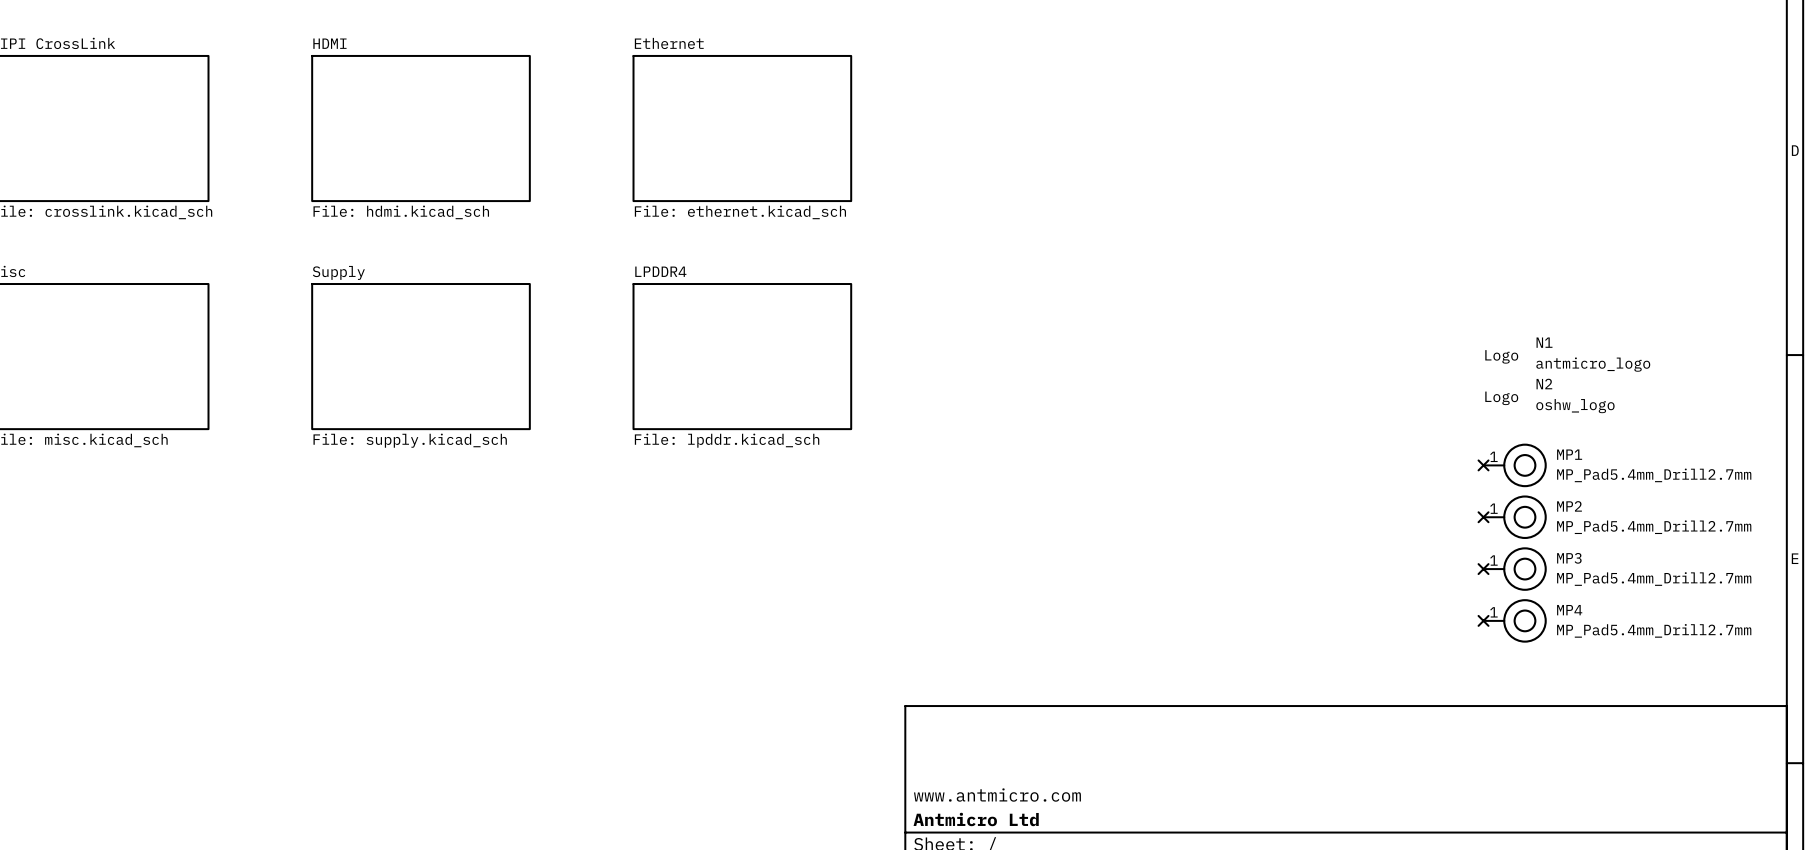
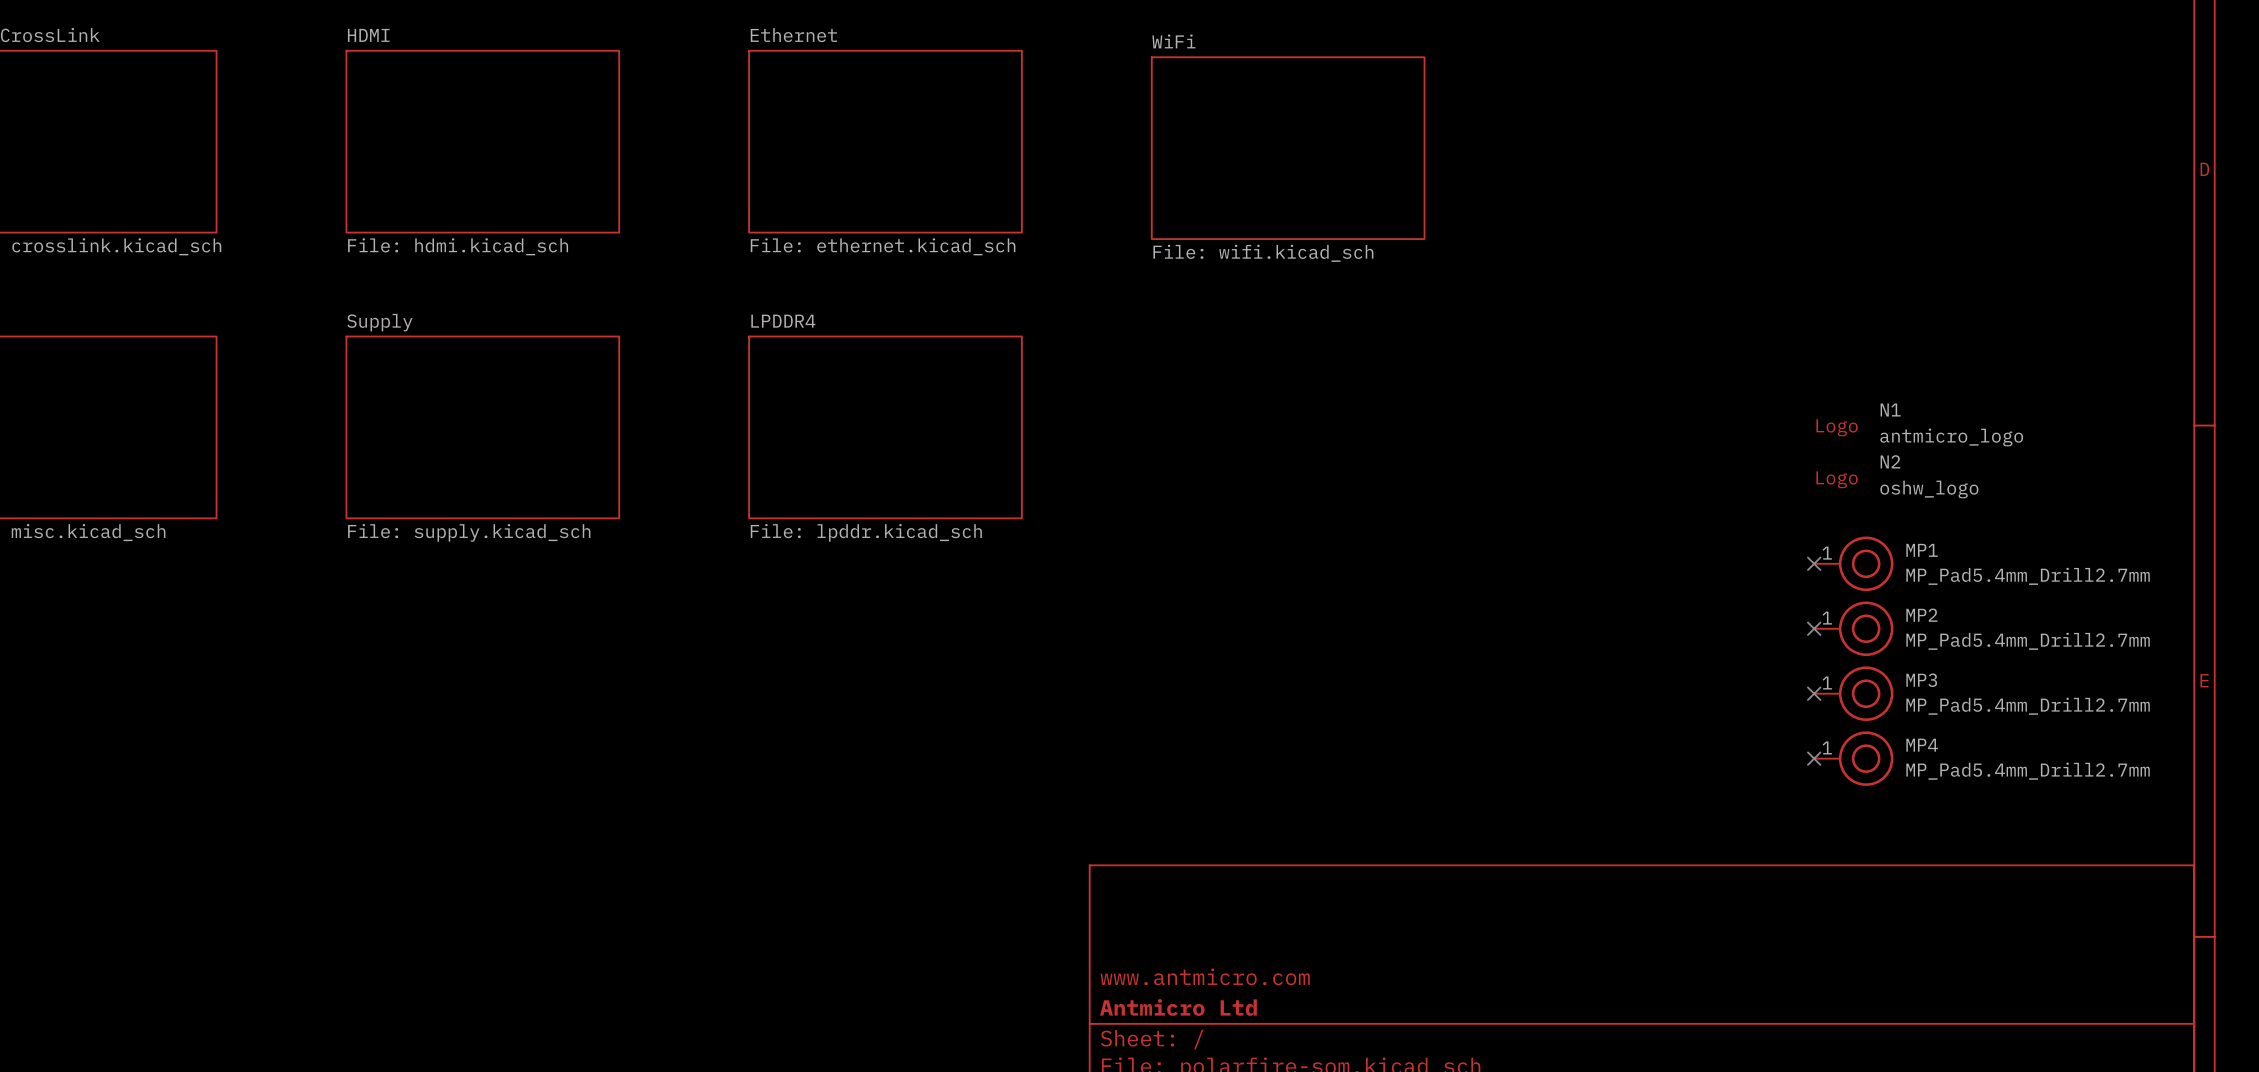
sheet WiFi: none -> File: wifi.kicad_sch (1288, 148)

